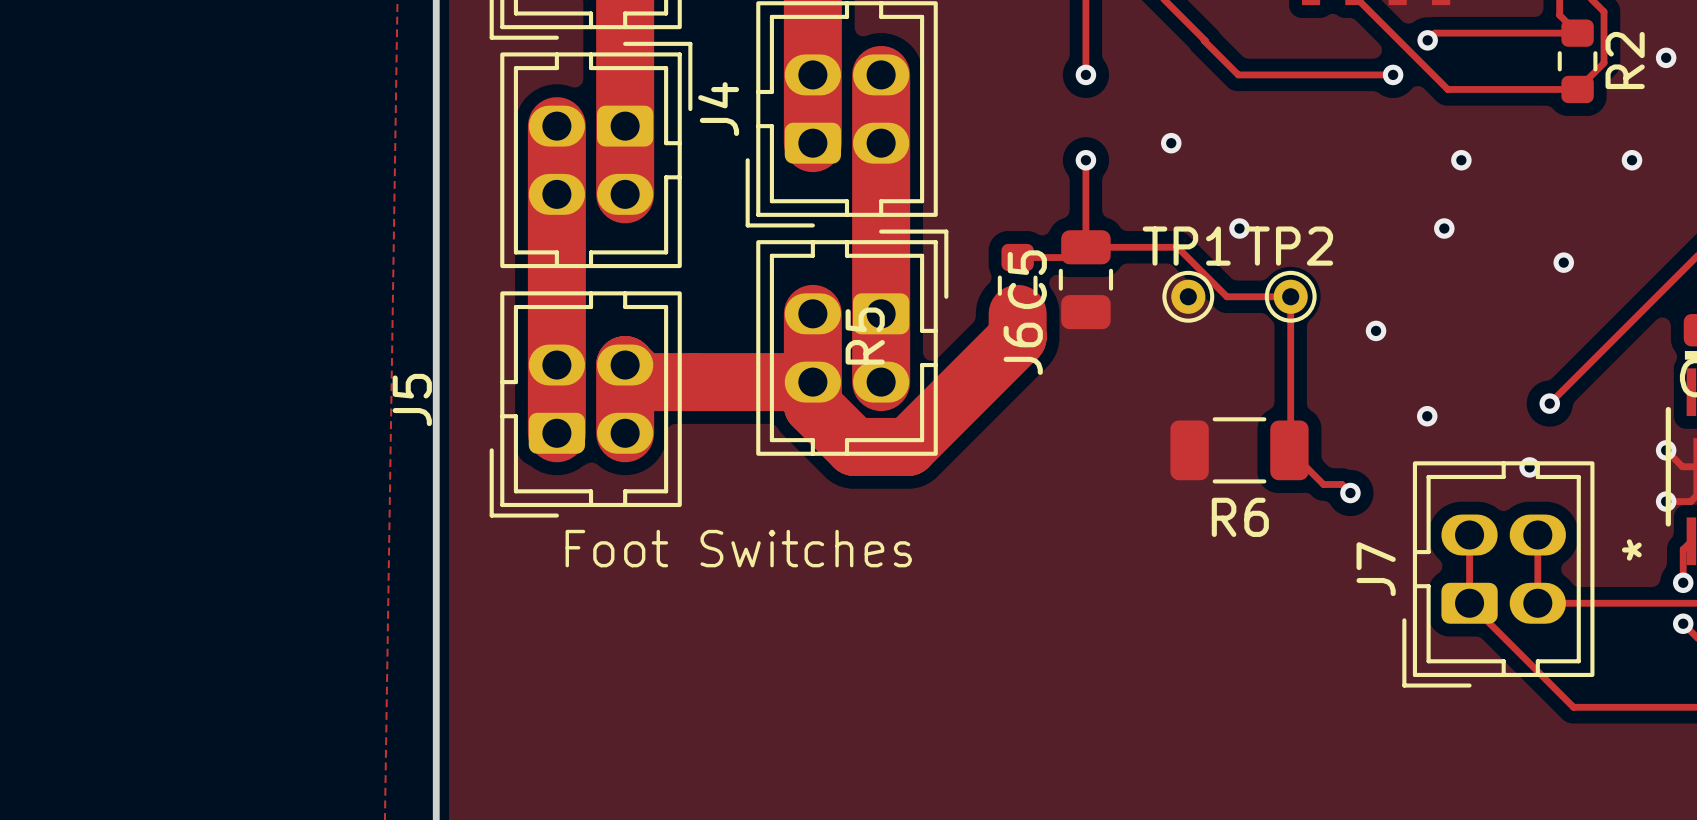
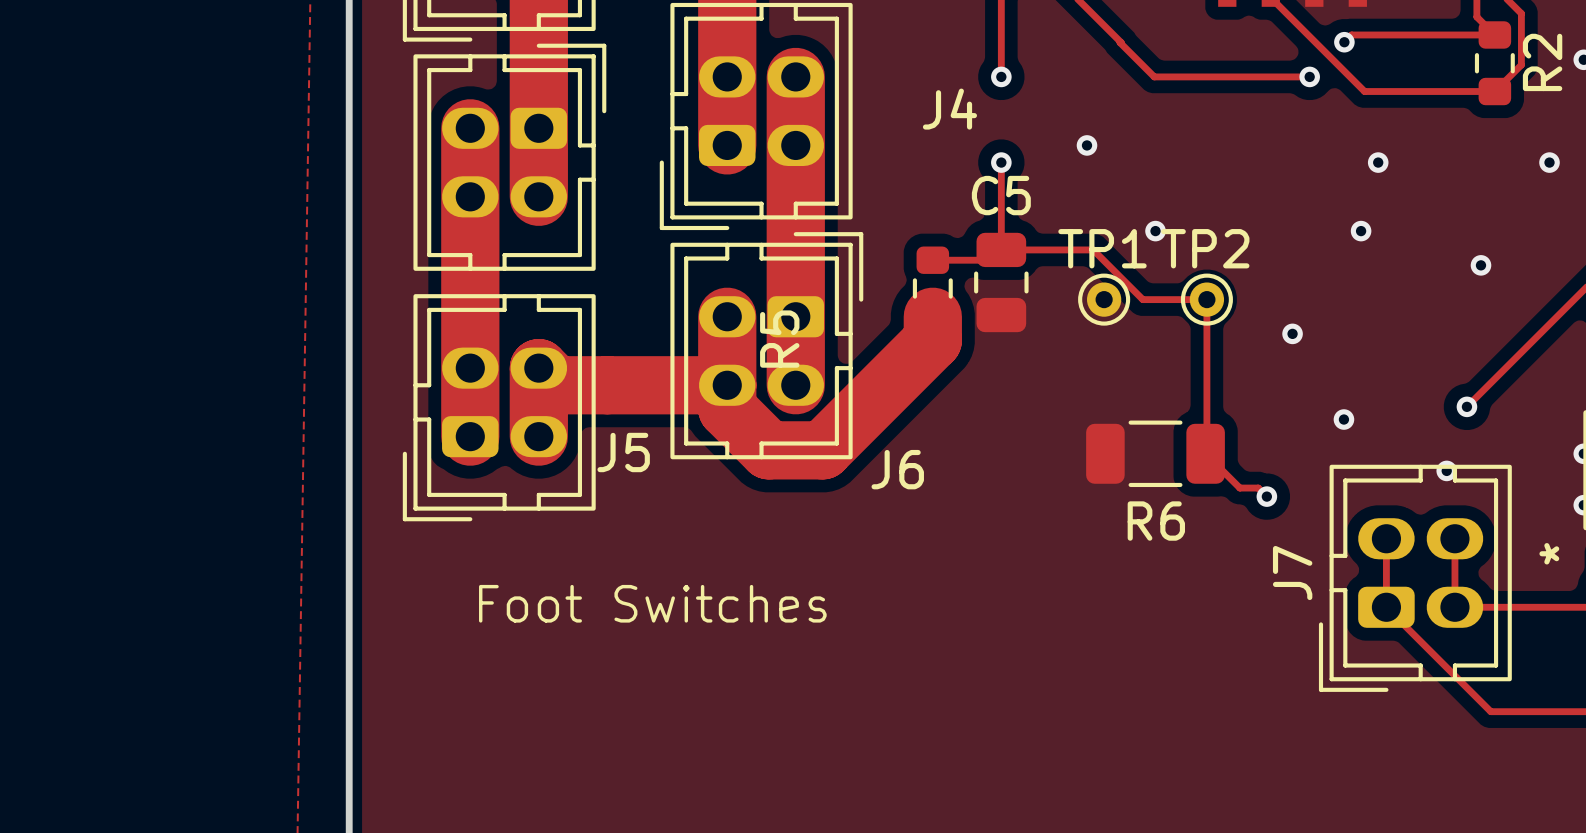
J4 name rotation: 0° (718, 109) -> 90° clockwise (949, 109)
J4 name position: J4 (718, 109) -> J4 (949, 109)
C5 name rotation: 0° (1027, 279) -> 90° clockwise (1001, 195)
C5 name position: C5 (1027, 279) -> C5 (1001, 195)
J6 name rotation: 0° (1023, 348) -> 90° clockwise (897, 469)
J6 name position: J6 (1023, 348) -> J6 (897, 469)
J5 name rotation: 0° (412, 399) -> 90° clockwise (623, 452)
J5 name position: J5 (412, 399) -> J5 (623, 452)
text position: Foot Switches (738, 548) -> Foot Switches (652, 603)

